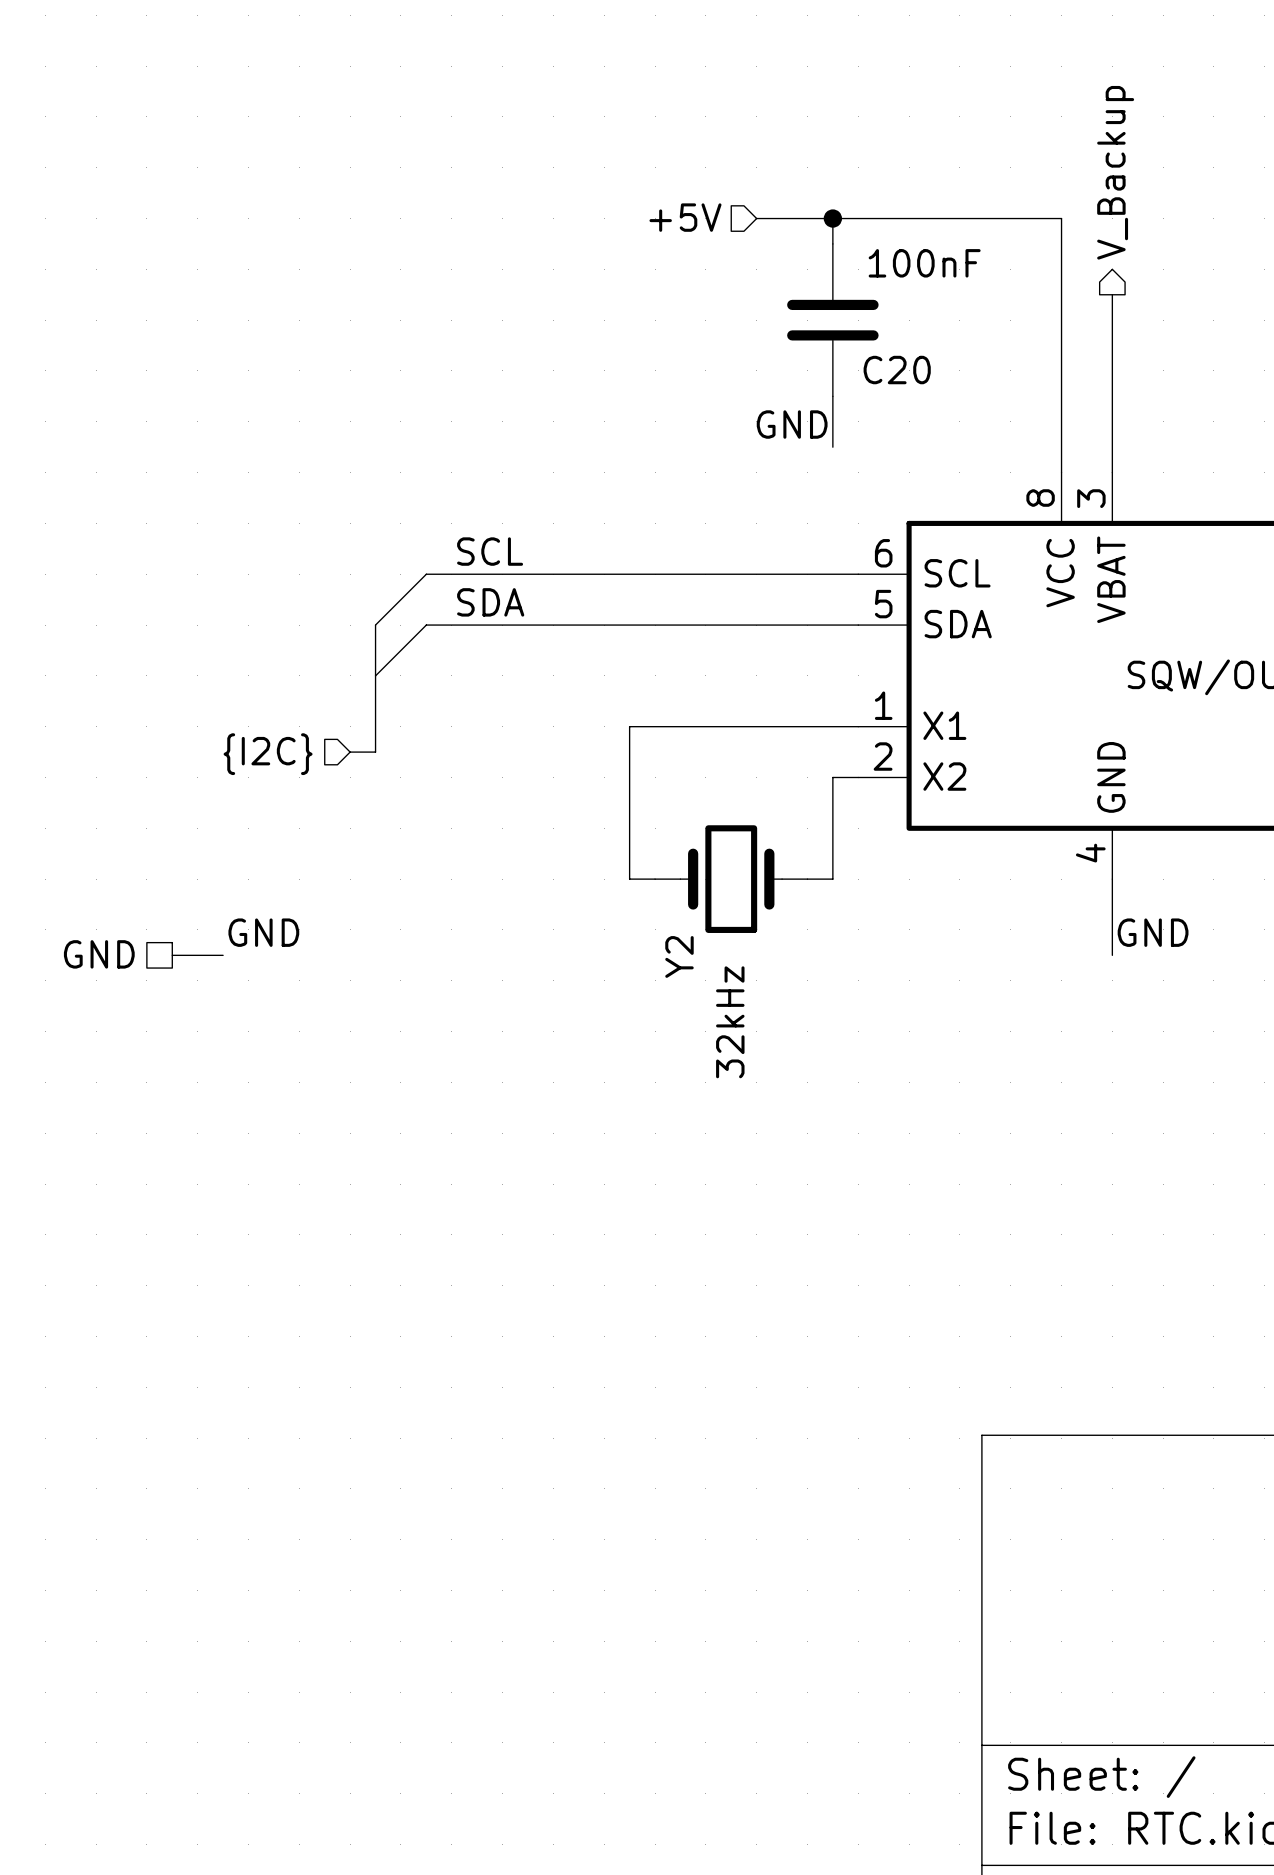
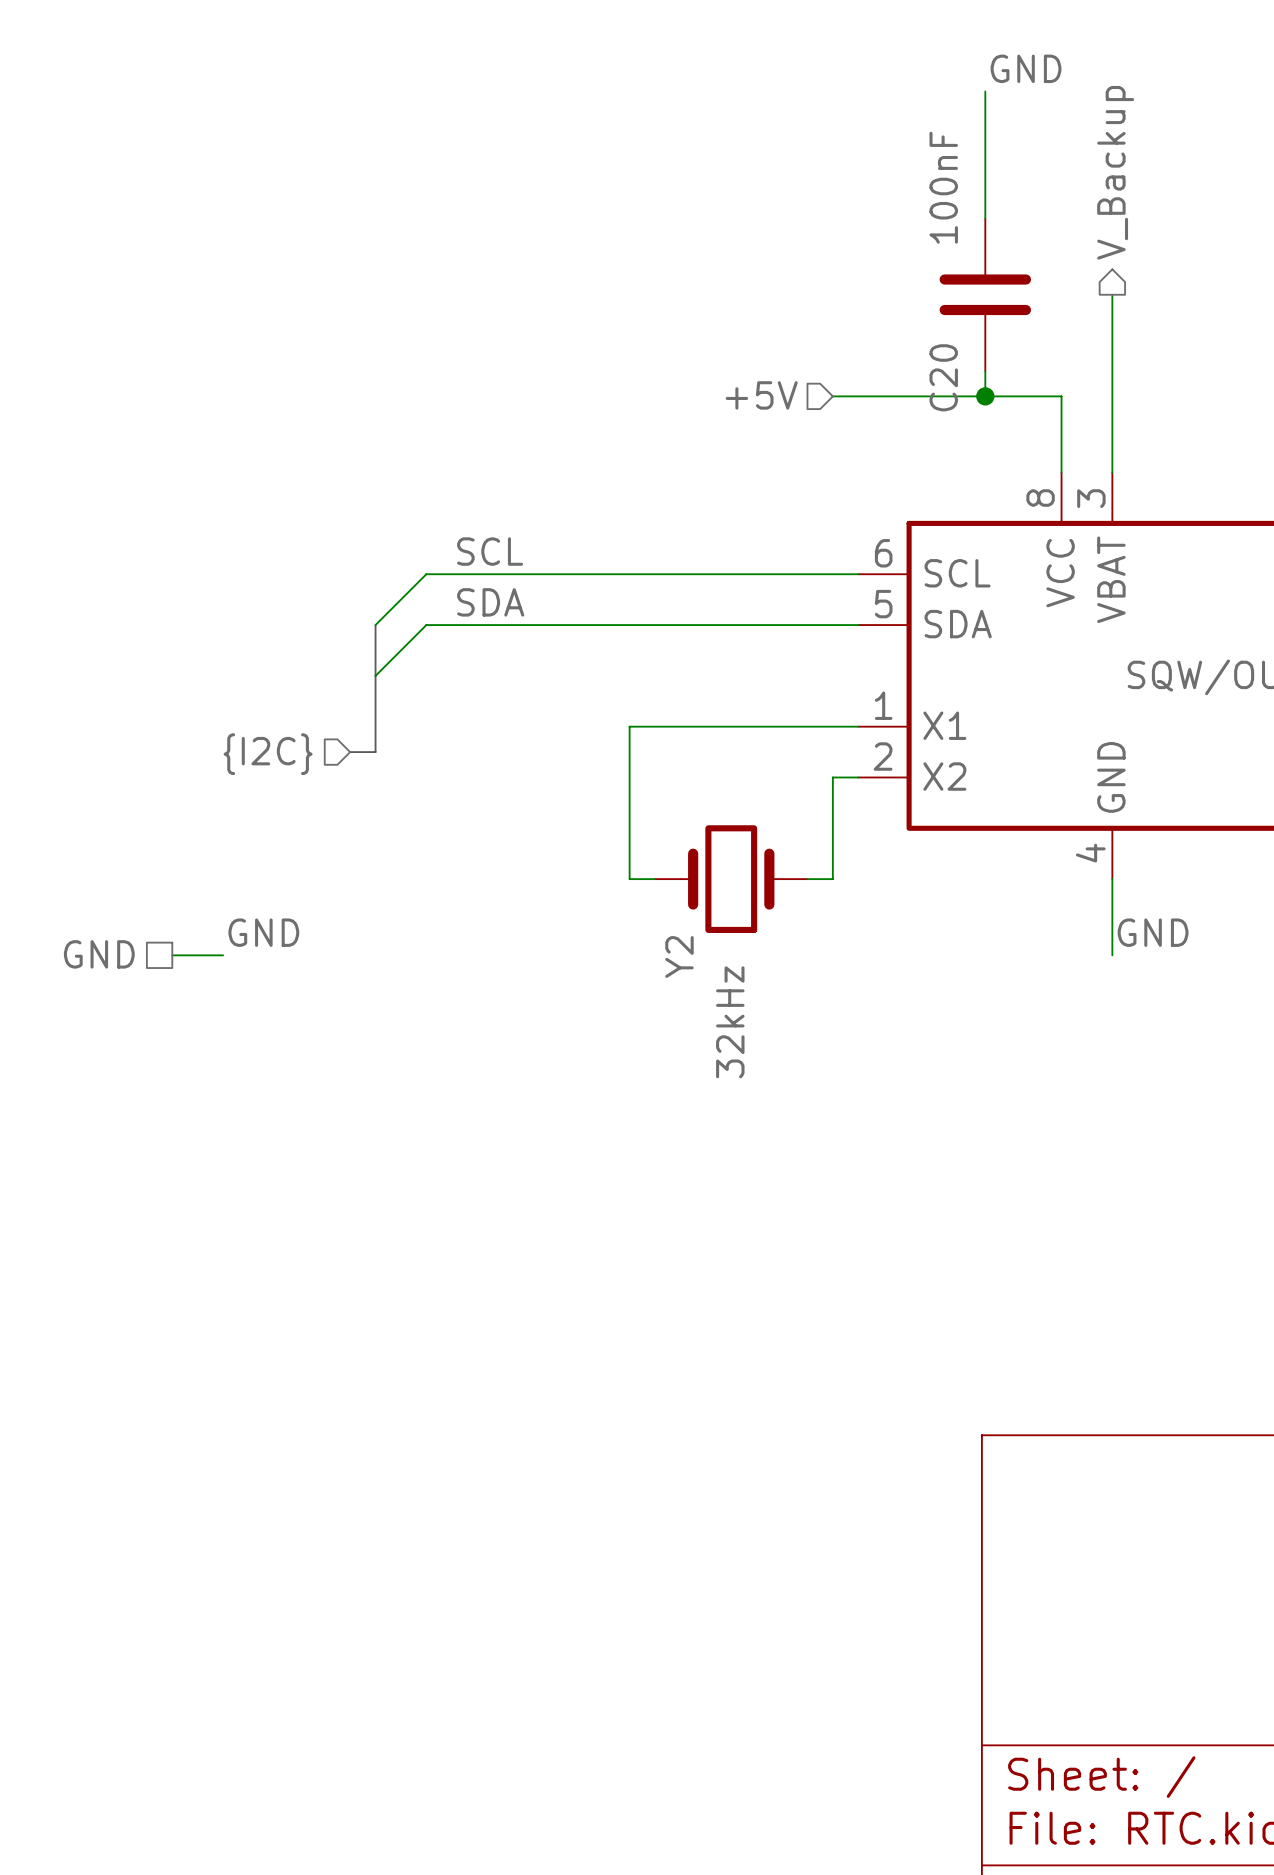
wire: none -> (985, 91) (985, 218)
hierarchical label position: +5V (685, 217) -> +5V (761, 395)
wire: (756, 218) (1061, 218) (1061, 396) -> (832, 396) (1061, 396)
wire: (832, 218) (832, 243) -> (985, 370) (985, 396)
junction: (832, 218) -> none
C20 value rotation: 0° (924, 263) -> 90° counterclockwise (943, 187)
C20 position: (832, 320) -> (985, 294)
C20 name rotation: 0° (897, 370) -> 90° counterclockwise (943, 377)
wire: (832, 396) (832, 447) -> none
junction: none -> (985, 396)
label position: GND (792, 424) -> GND (1026, 68)

